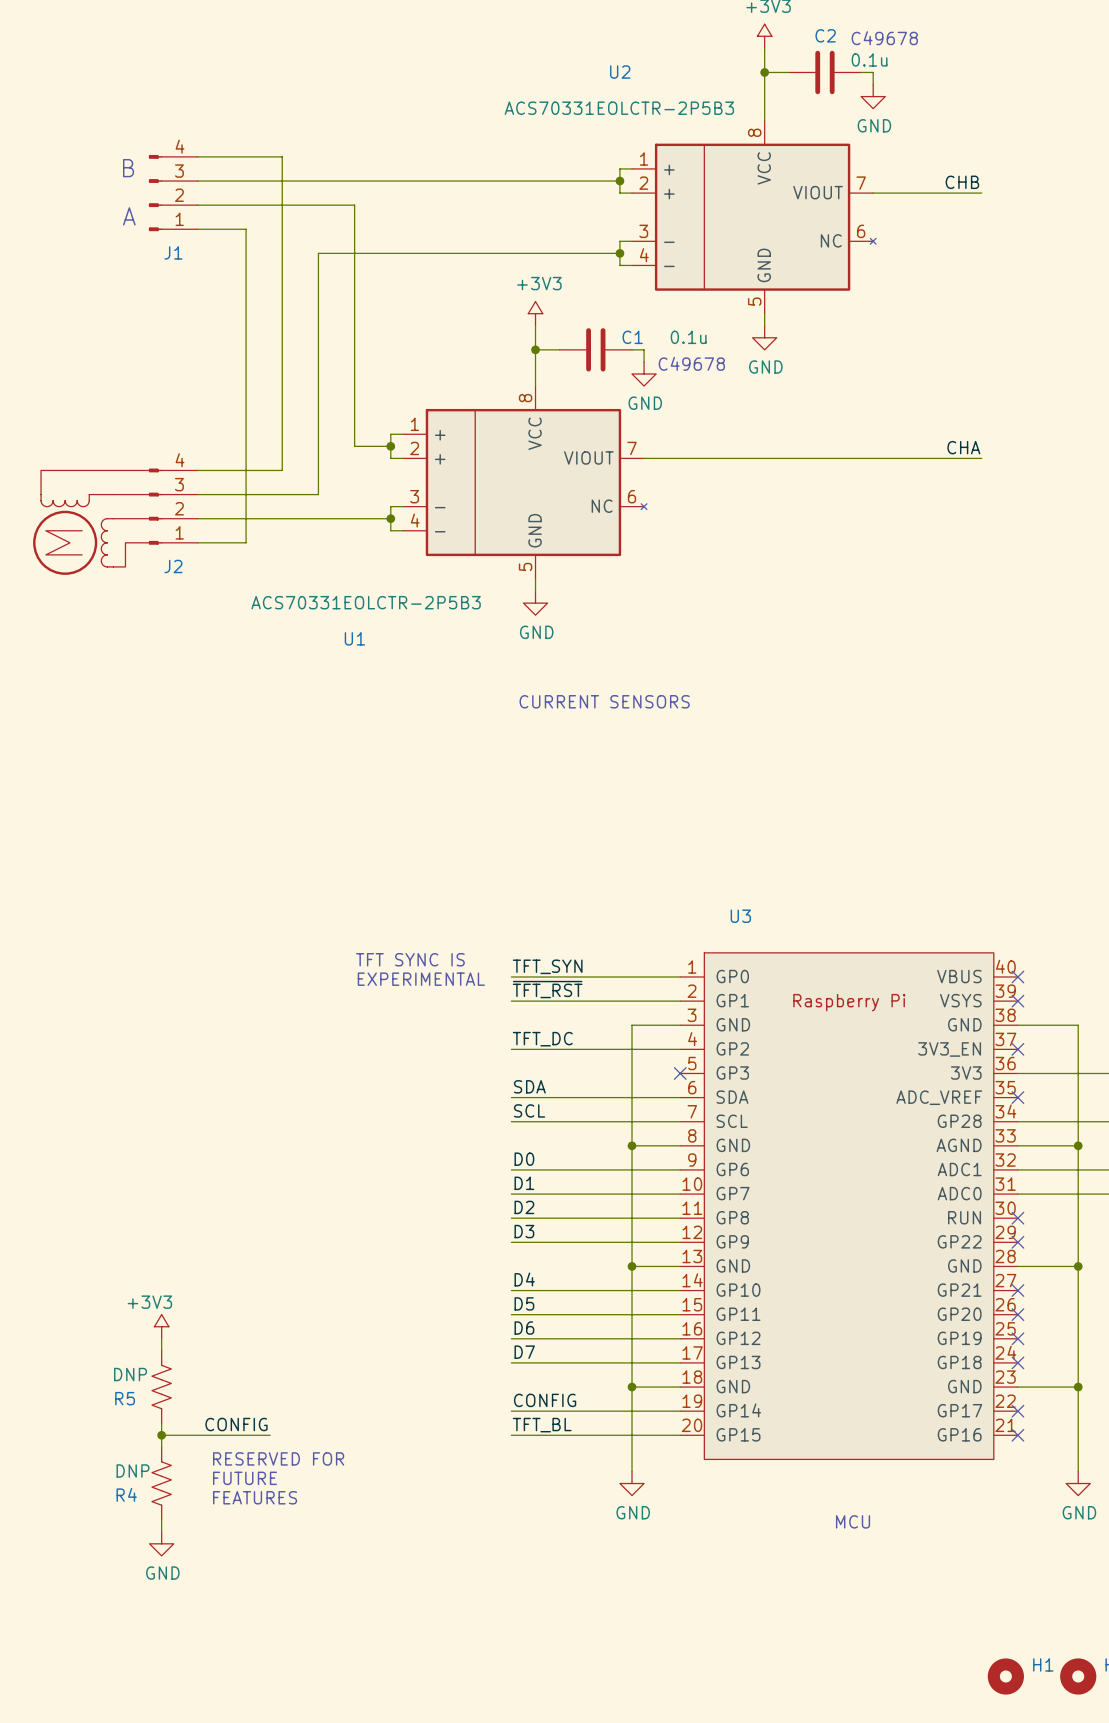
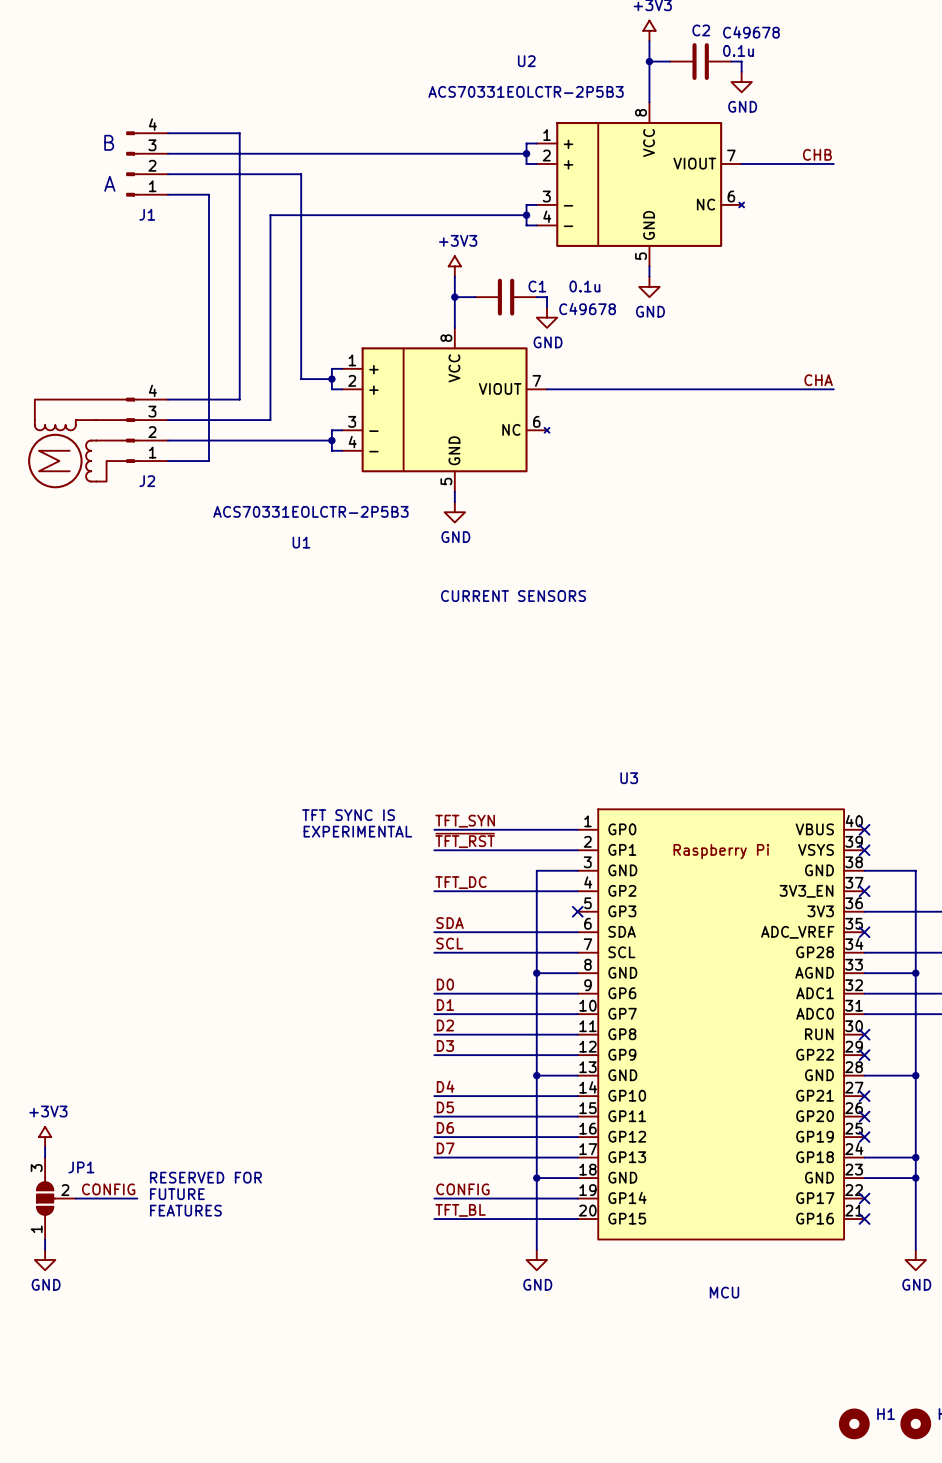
power symbol text position: +3V3 (149, 1302) -> +3V3 (48, 1111)
power symbol position: +3V3 (161, 1326) -> +3V3 (45, 1137)
wire: (161, 1338) (161, 1350) -> (45, 1147) (45, 1157)
wire: none -> (864, 1157) (915, 1157)
no-connect mark: (1017, 1362) -> none
junction: none -> (915, 1157)
R5: DNP (161, 1387) -> none
JP1: none -> (56, 1198)
wire: none -> (75, 1198) (137, 1198)
wire: (161, 1423) (161, 1447) -> none
label position: CONFIG (236, 1424) -> CONFIG (108, 1189)
wire: (161, 1435) (270, 1435) -> none
junction: (161, 1435) -> none
text position: RESERVED FOR (278, 1458) -> RESERVED FOR (205, 1177)
text position: FUTURE (245, 1478) -> FUTURE (177, 1194)
R4: DNP (161, 1483) -> none
text position: FEATURES (255, 1497) -> FEATURES (185, 1210)
wire: (161, 1519) (161, 1531) -> (45, 1239) (45, 1249)
power symbol position: GND (161, 1543) -> GND (45, 1260)

